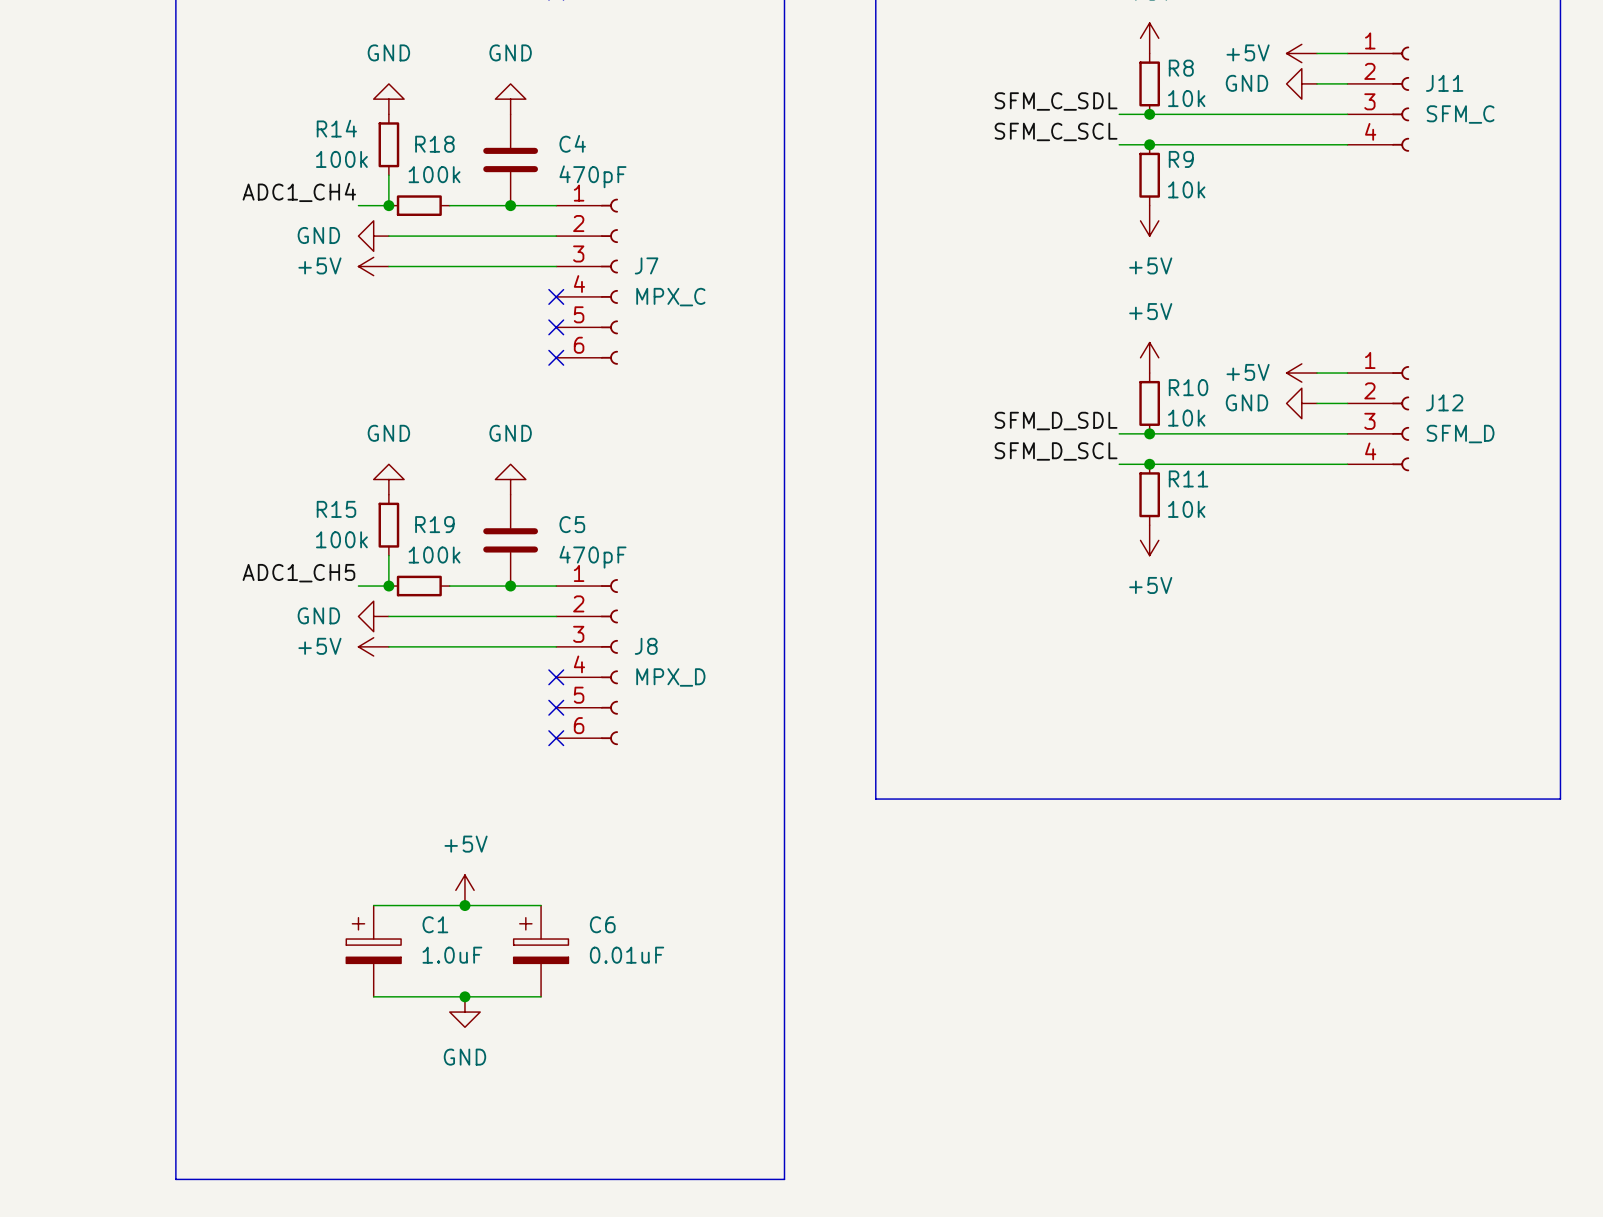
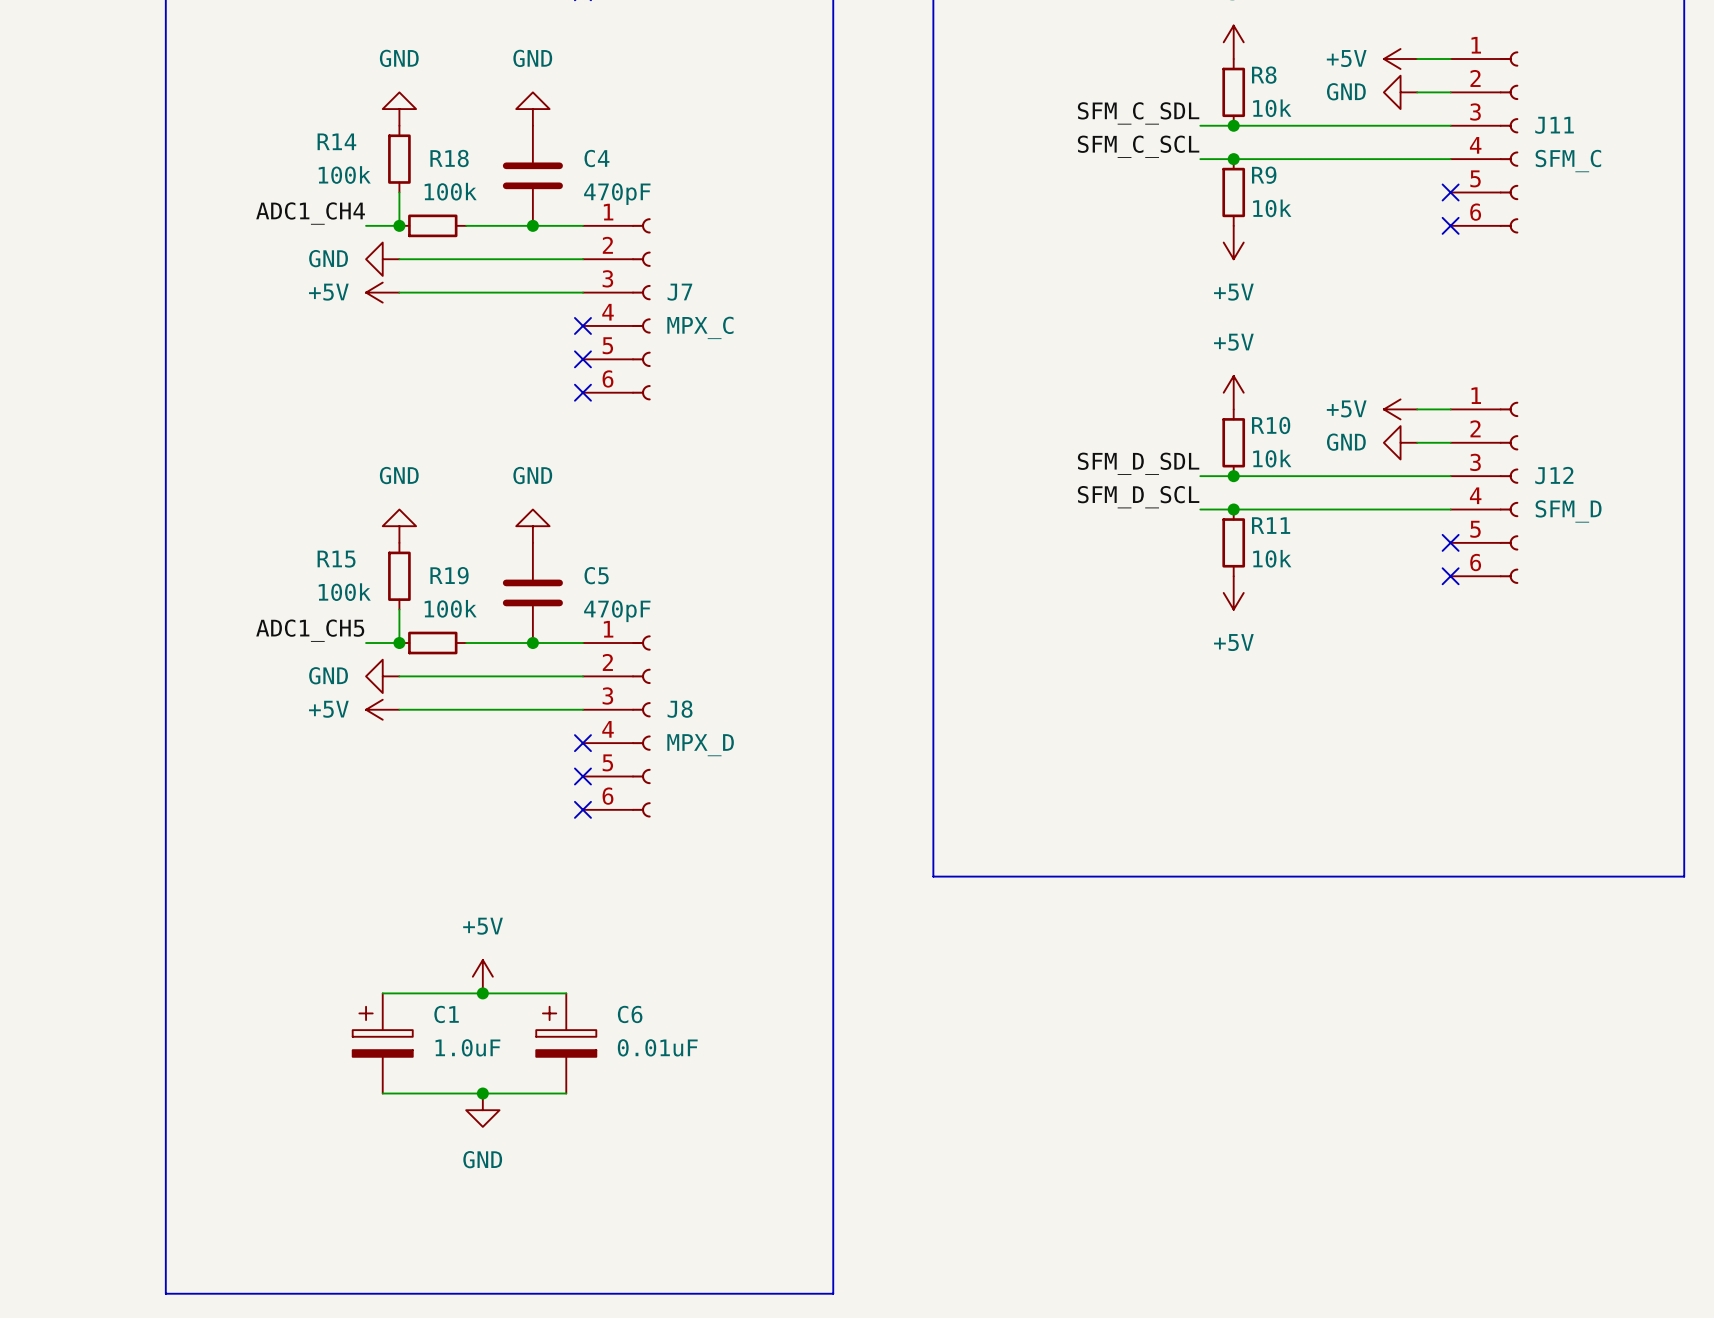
J11 symbol: [1347, 46, 1410, 152] -> [1450, 51, 1519, 234]
no-connect mark: none -> (1450, 192)
no-connect mark: none -> (1450, 225)
J12 symbol: [1347, 366, 1410, 472] -> [1450, 401, 1519, 584]
no-connect mark: none -> (1450, 542)
no-connect mark: none -> (1450, 576)

